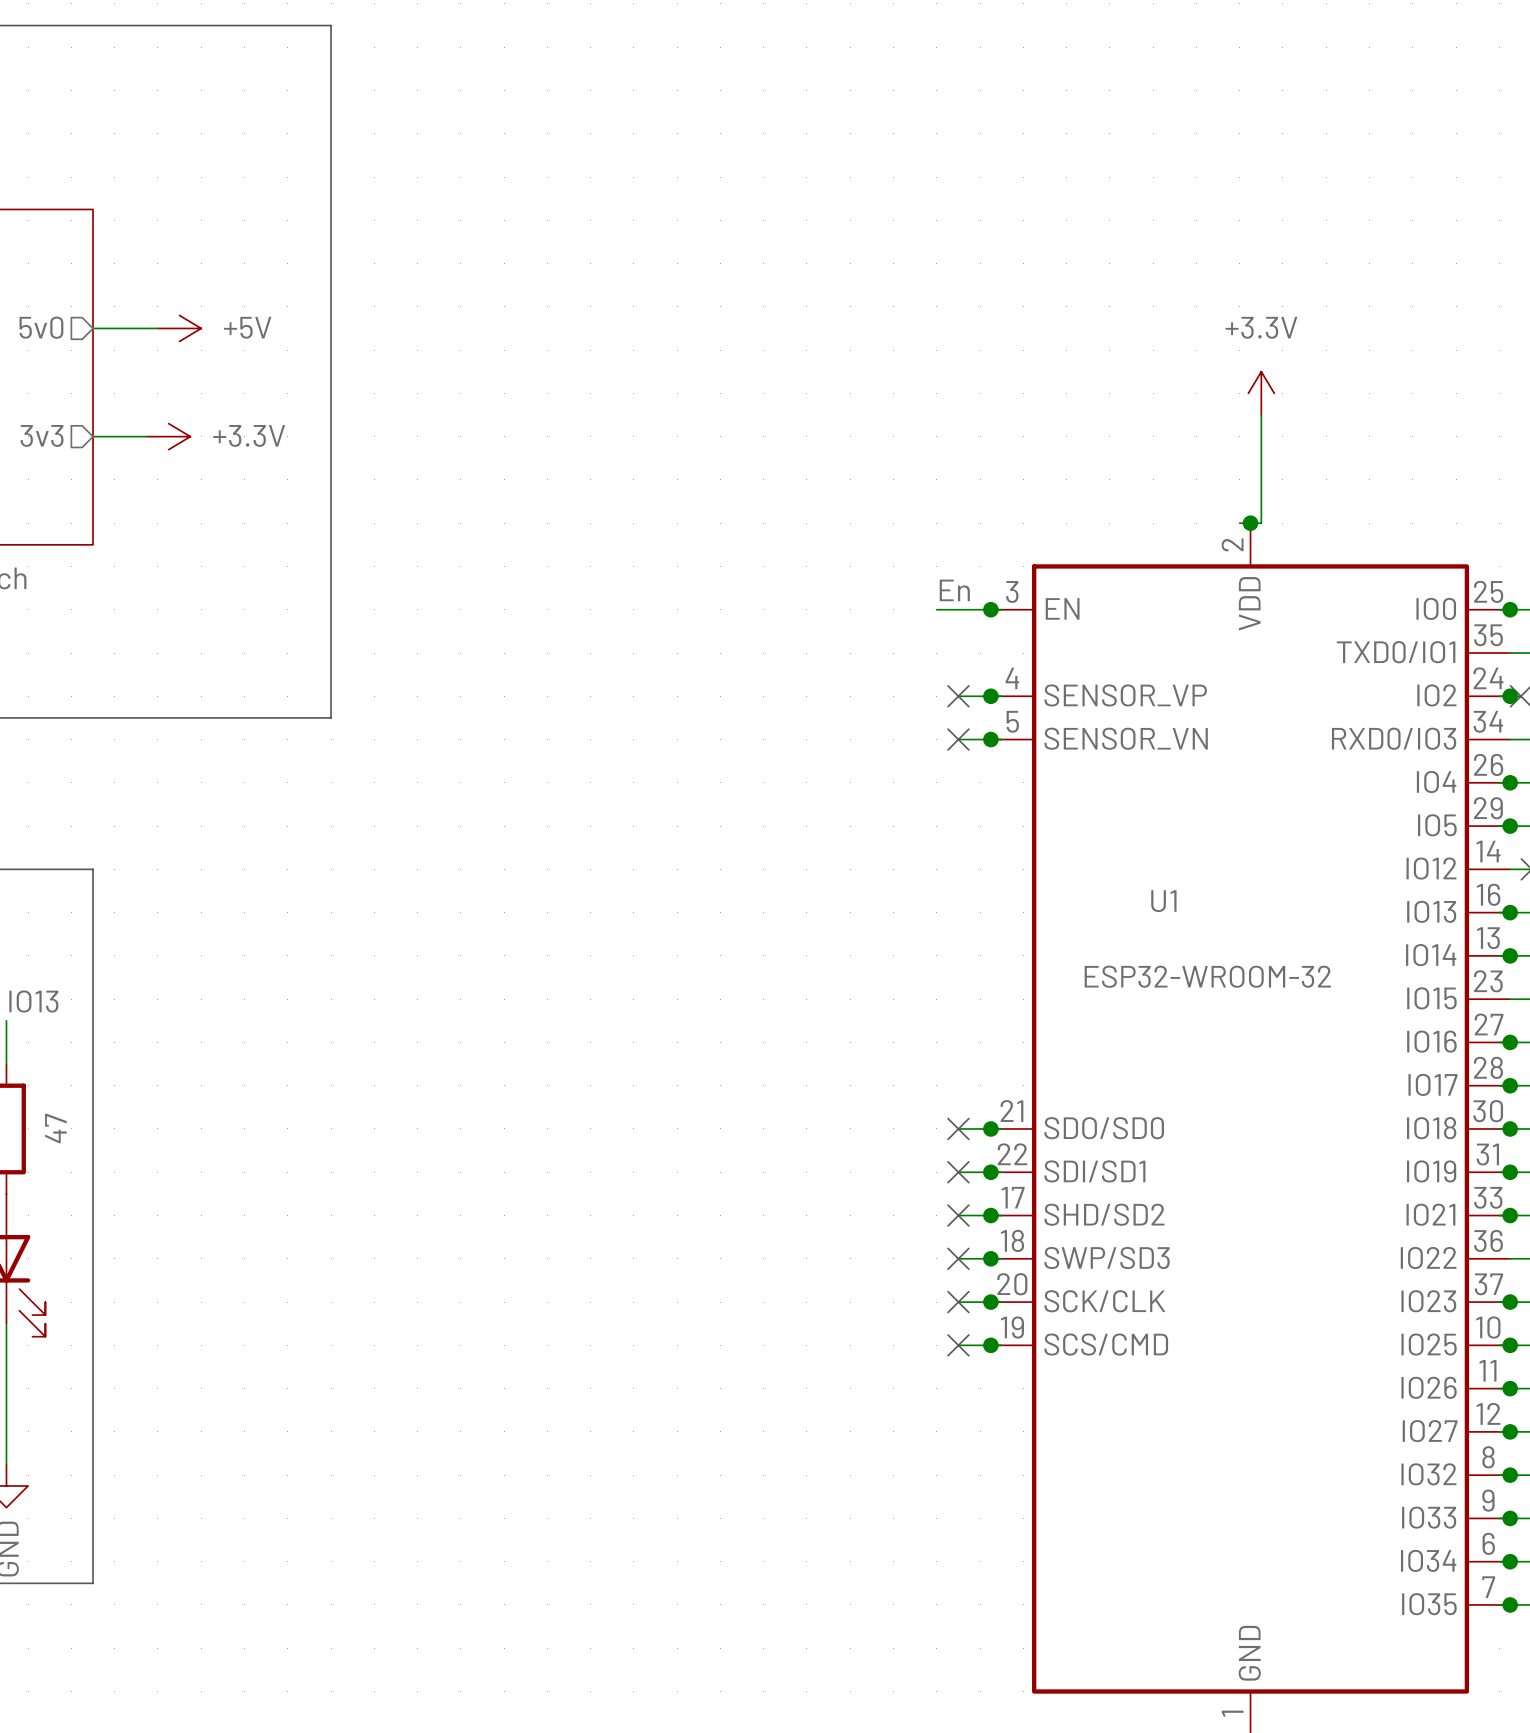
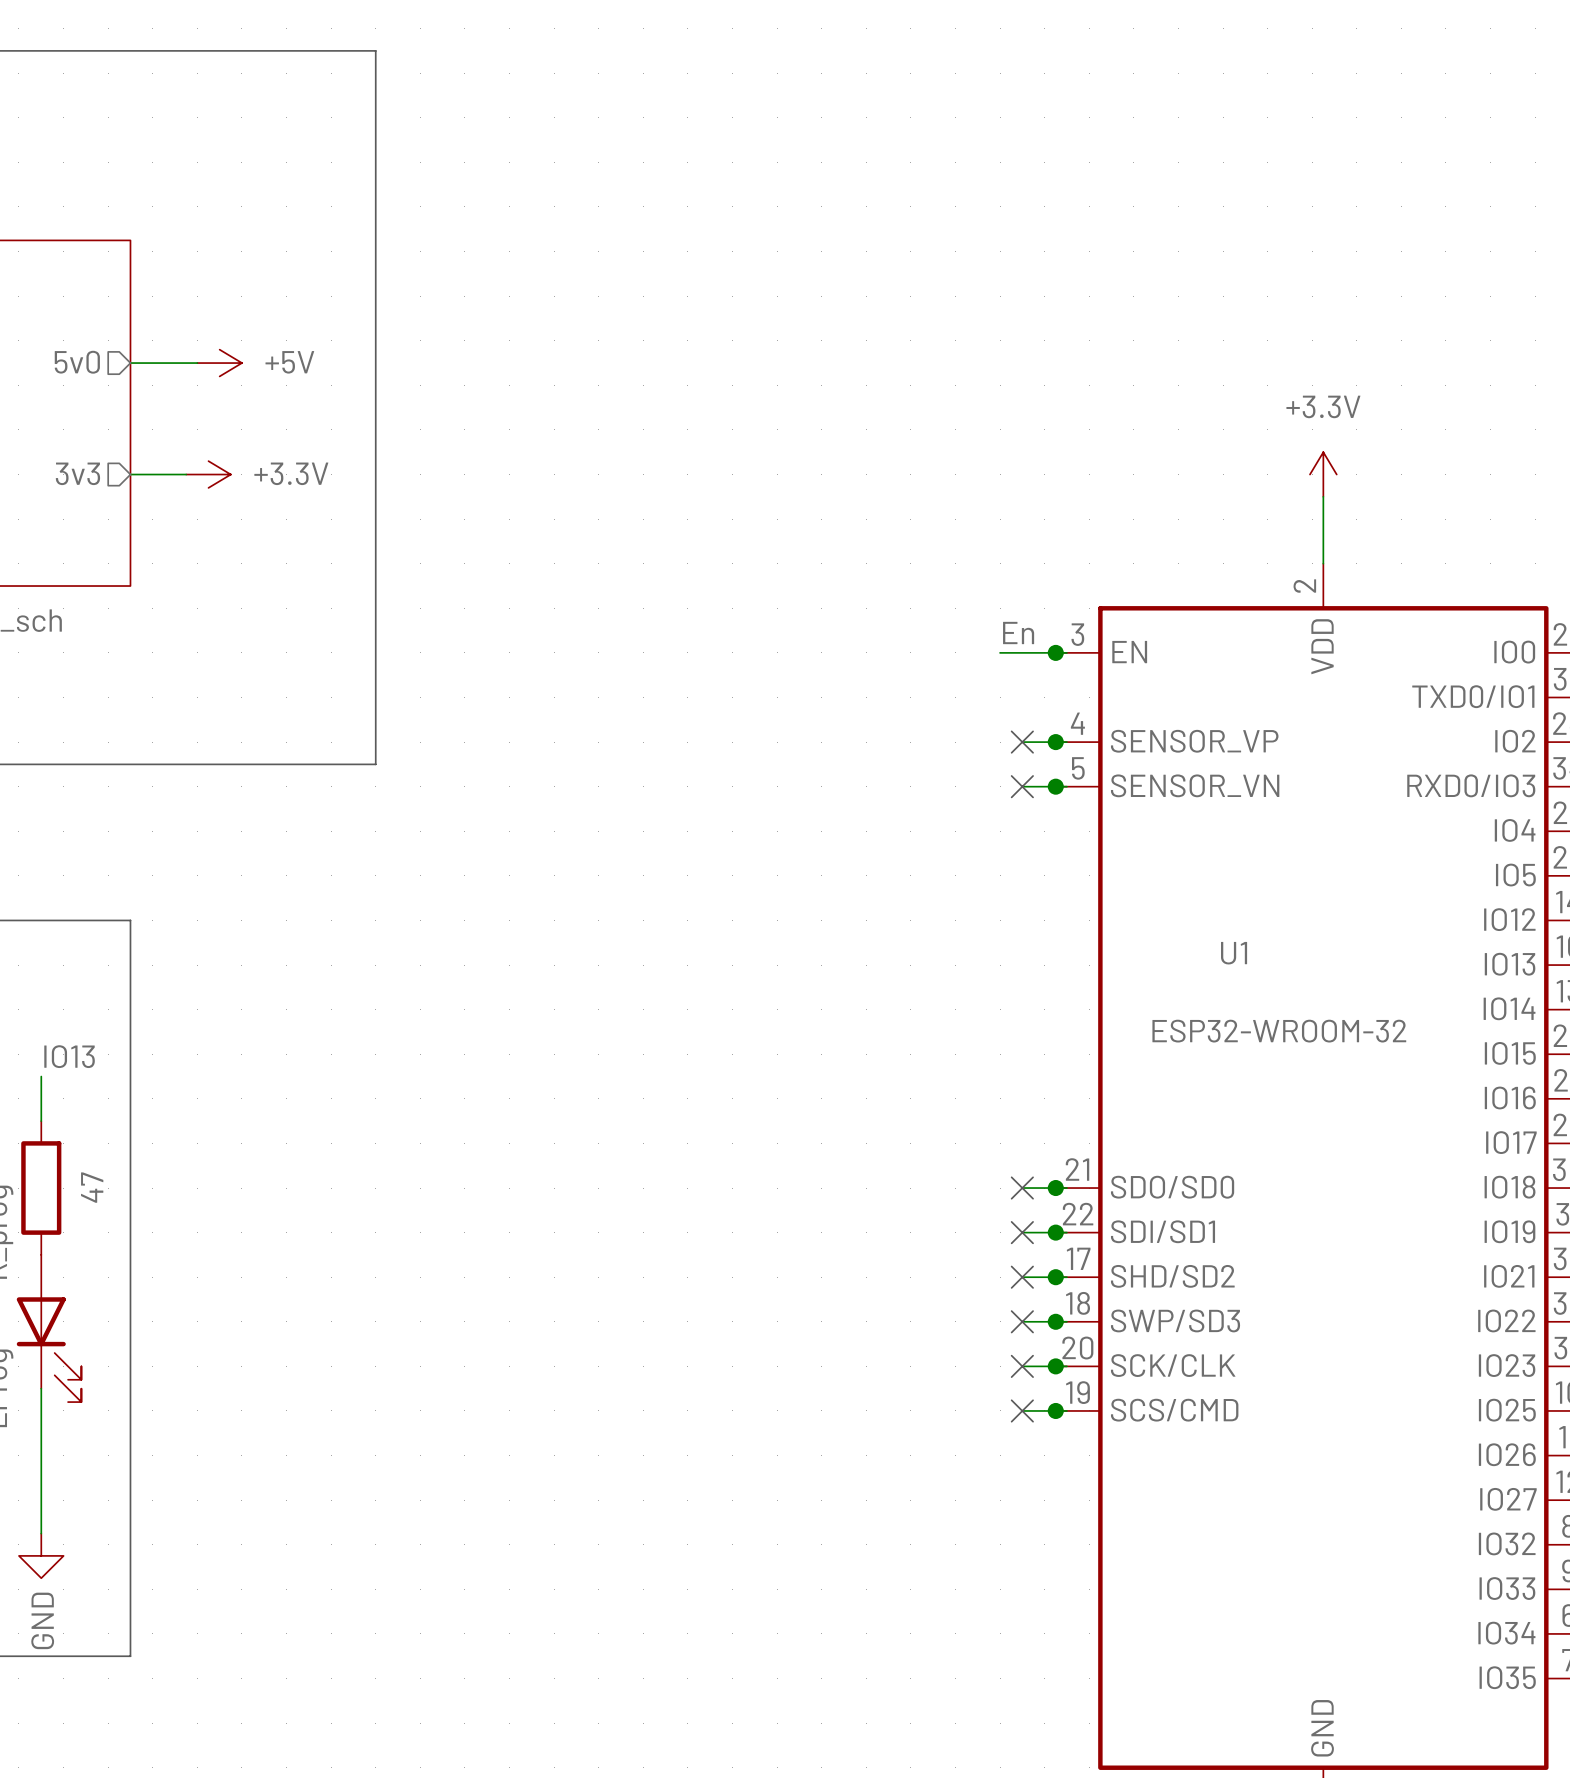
power symbol position: +3.3V (1261, 393) -> +3.3V (1323, 474)
wire: (1261, 415) (1261, 523) (1239, 523) -> none
wire: none -> (1323, 496) (1323, 563)
junction: (1250, 523) -> none

